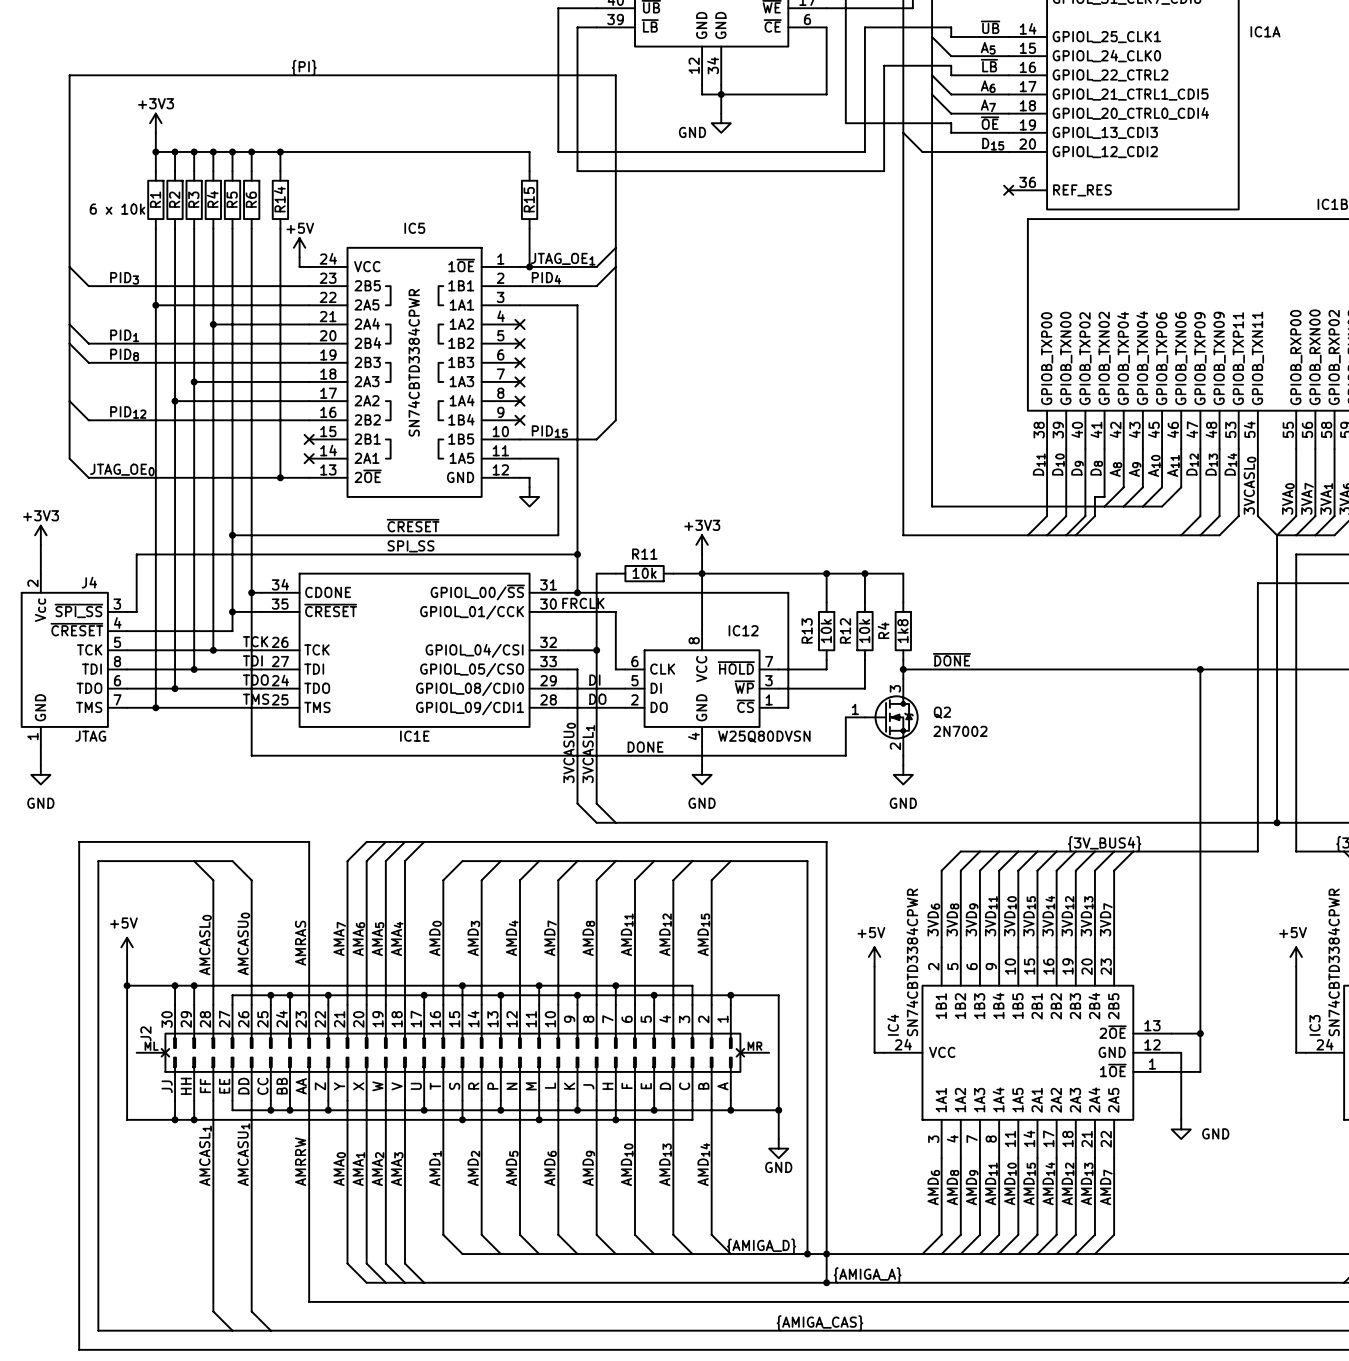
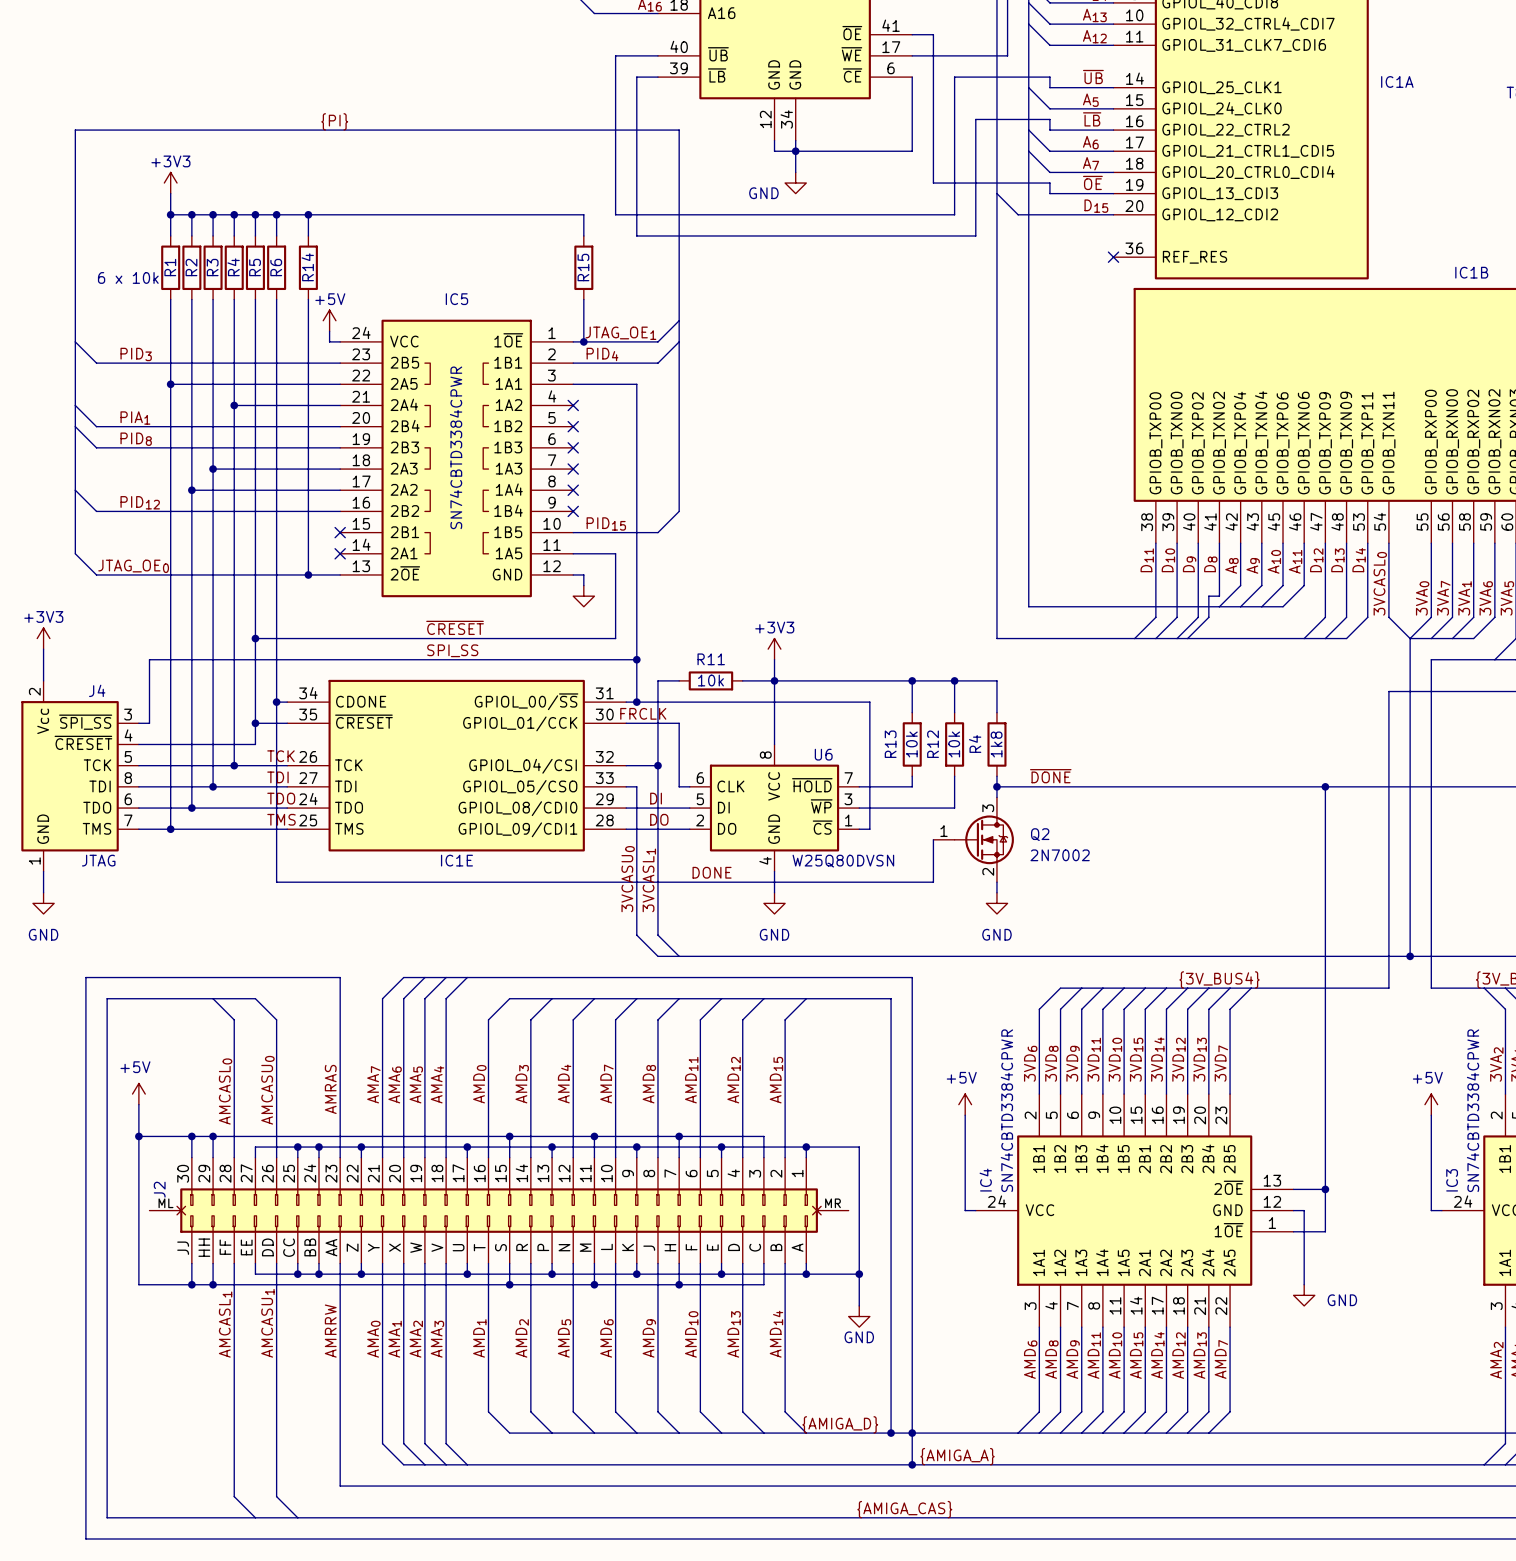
label: PID1 (124, 335) -> PIA1 (135, 418)
IC12 name: IC12 (743, 630) -> U6 (823, 754)

